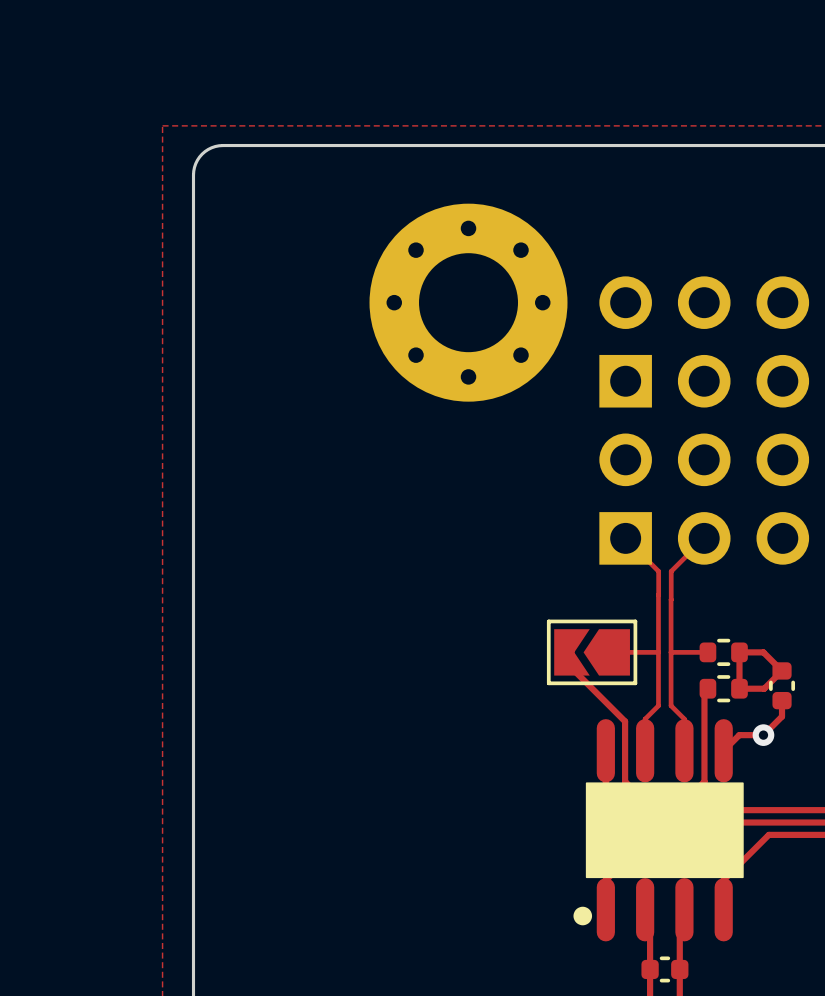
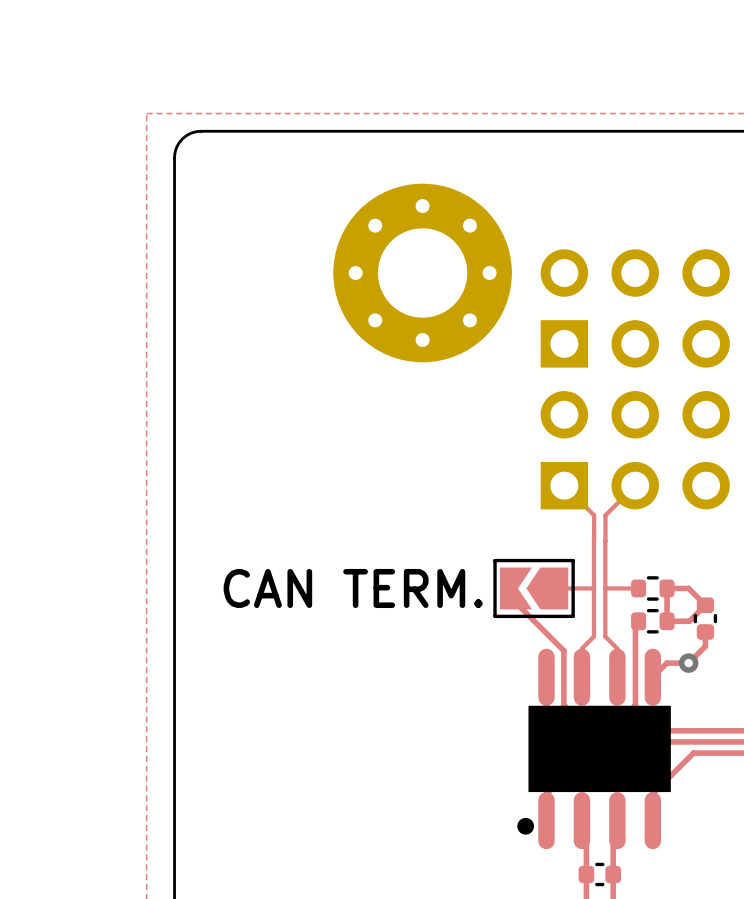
text: none -> CAN TERM. (353, 588)

